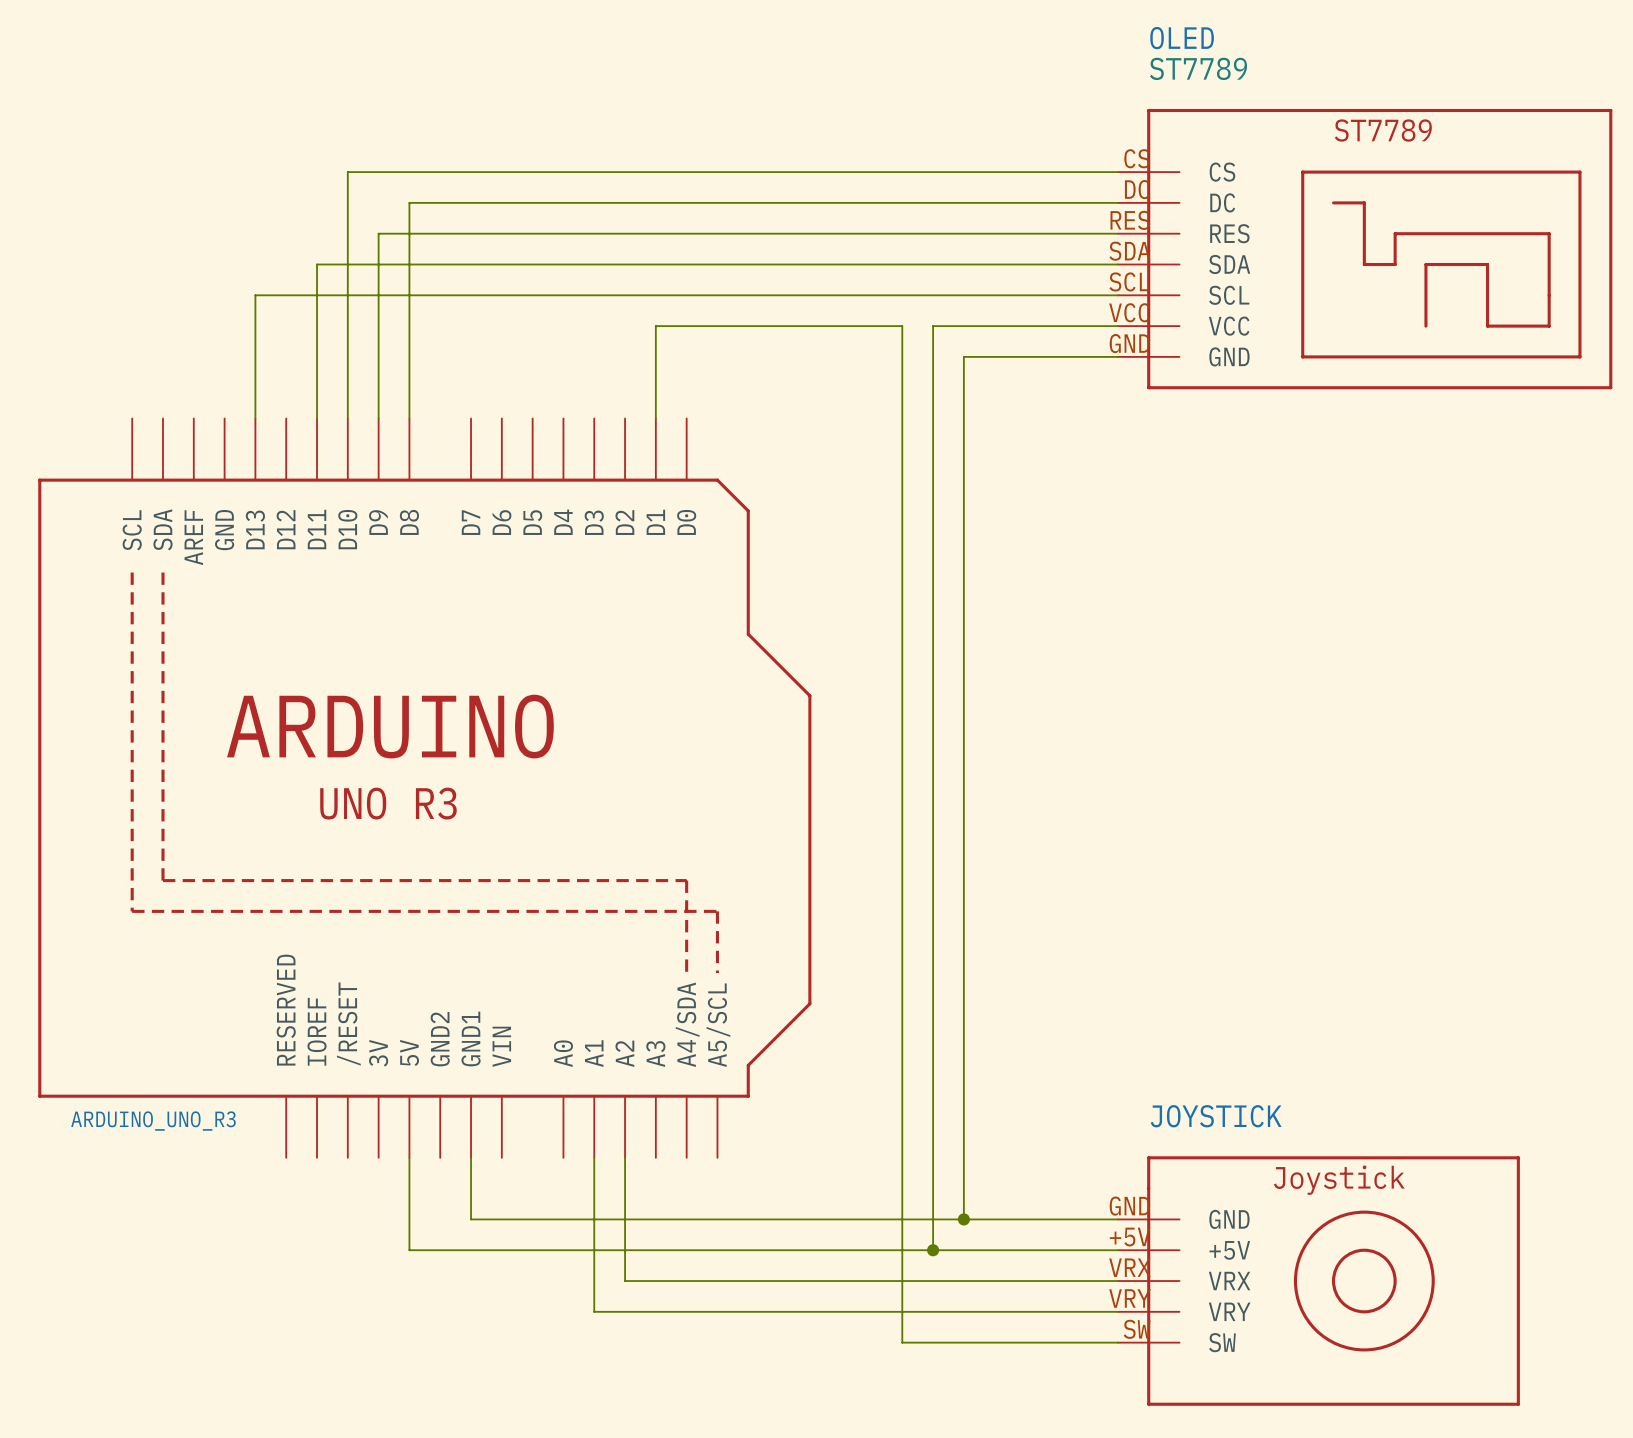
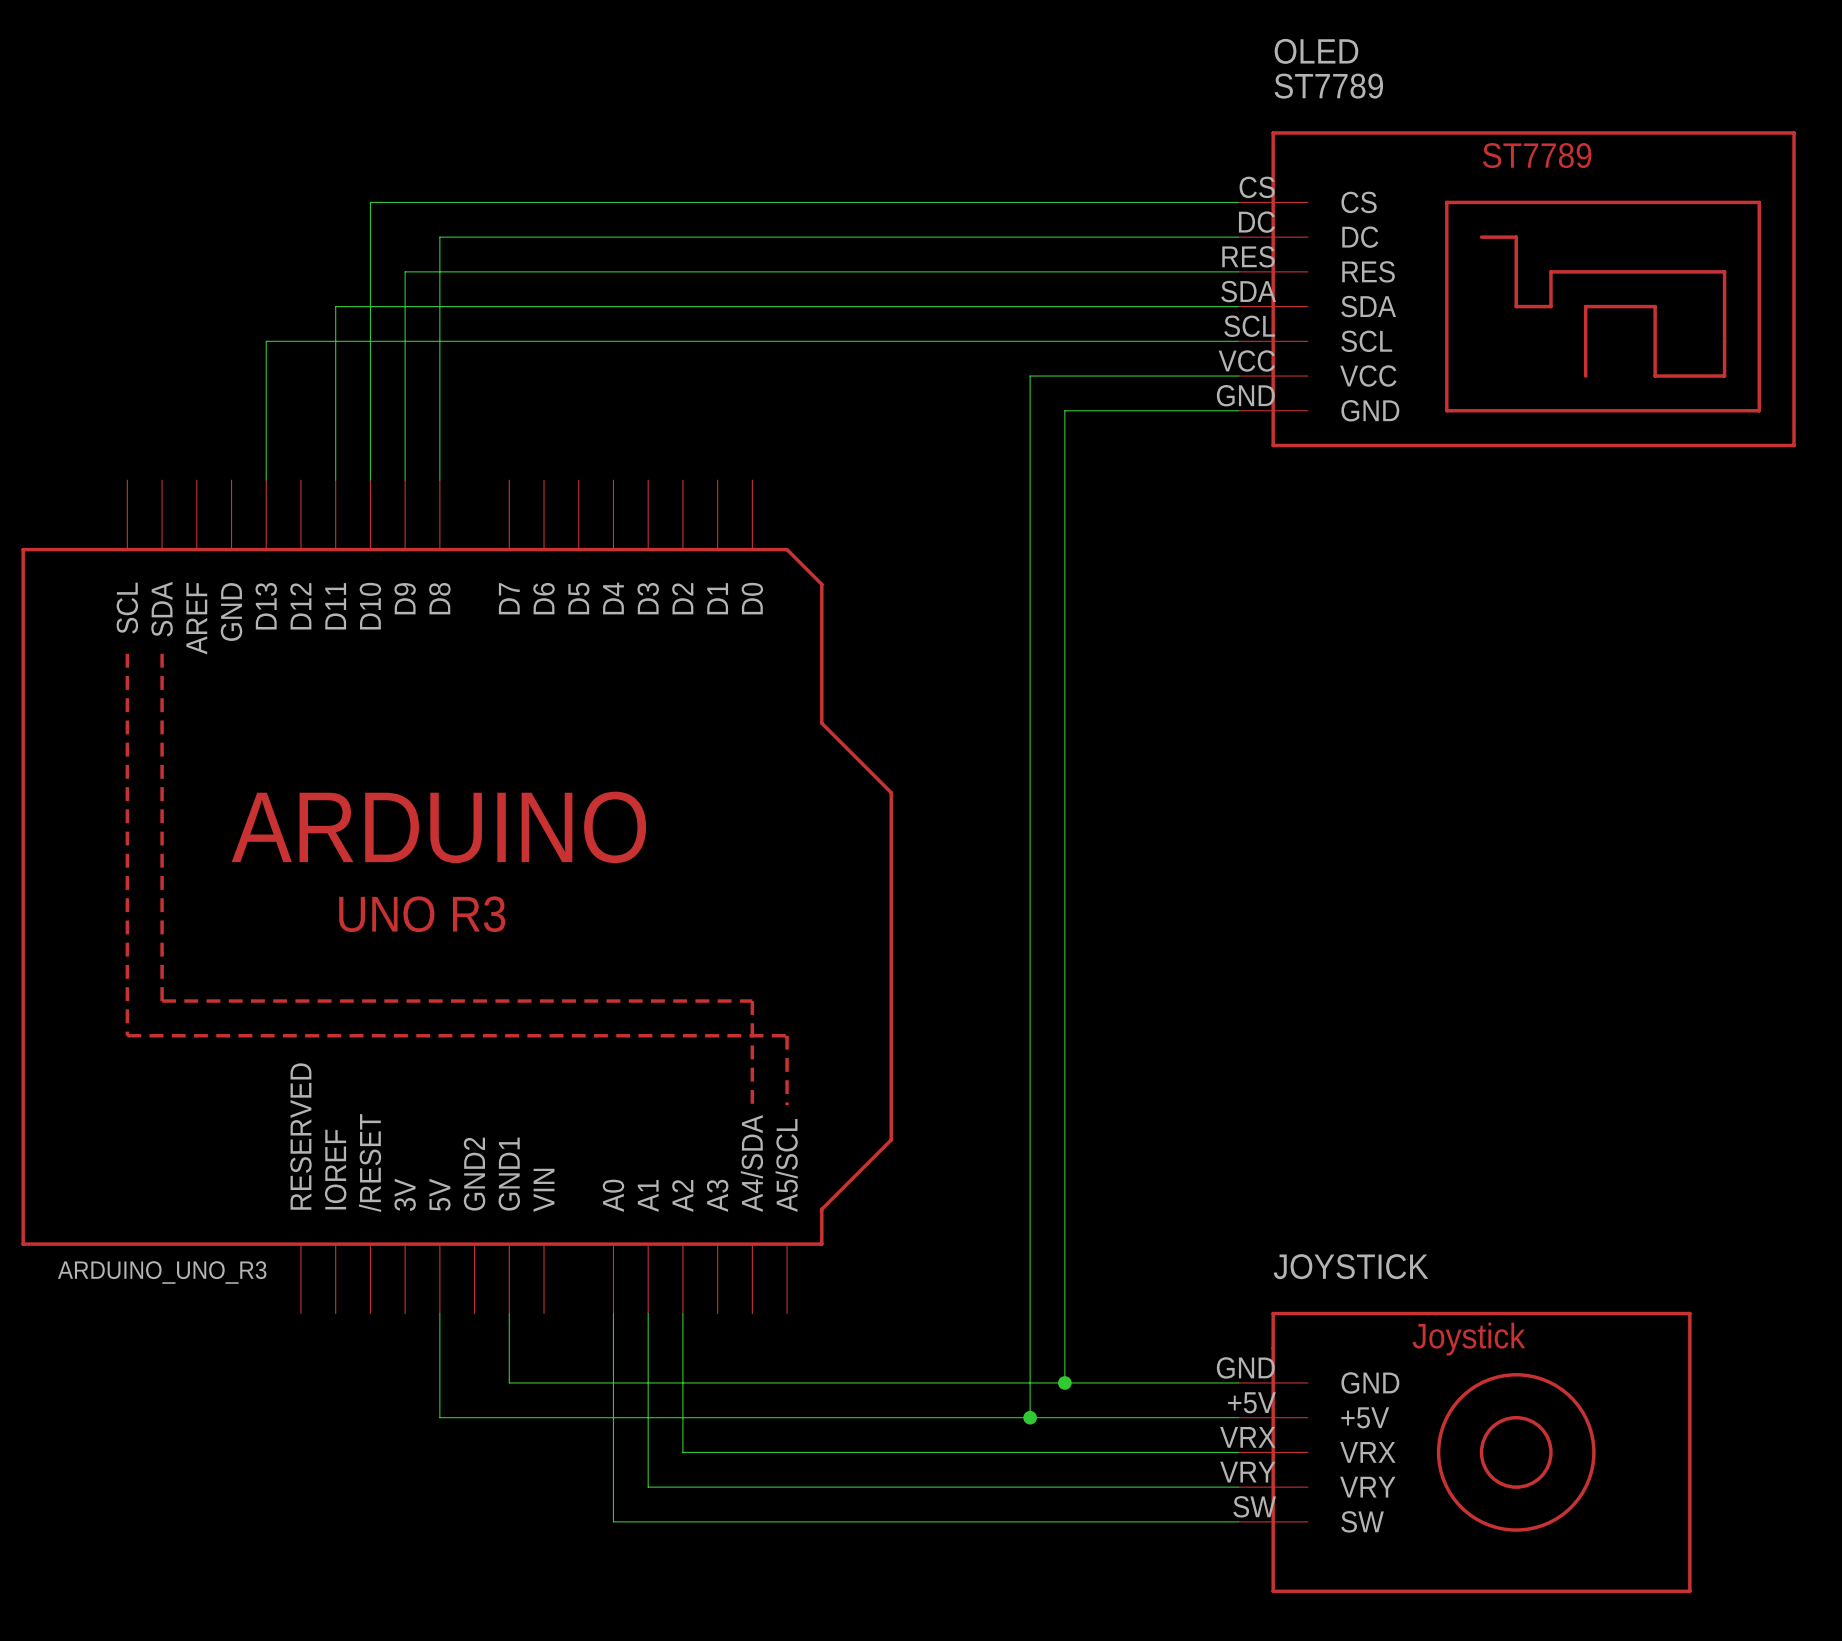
wire: (655, 418) (655, 326) (902, 326) (902, 1342) -> (613, 1313) (613, 1521) (995, 1521)

